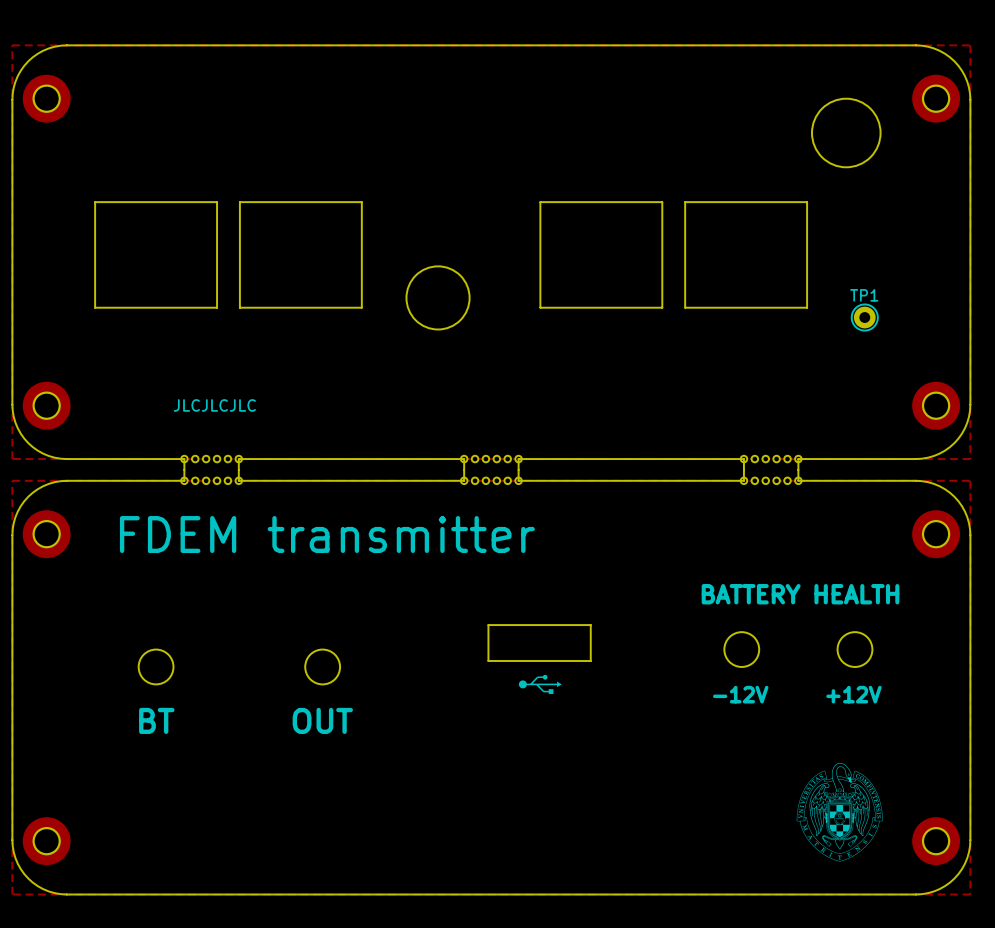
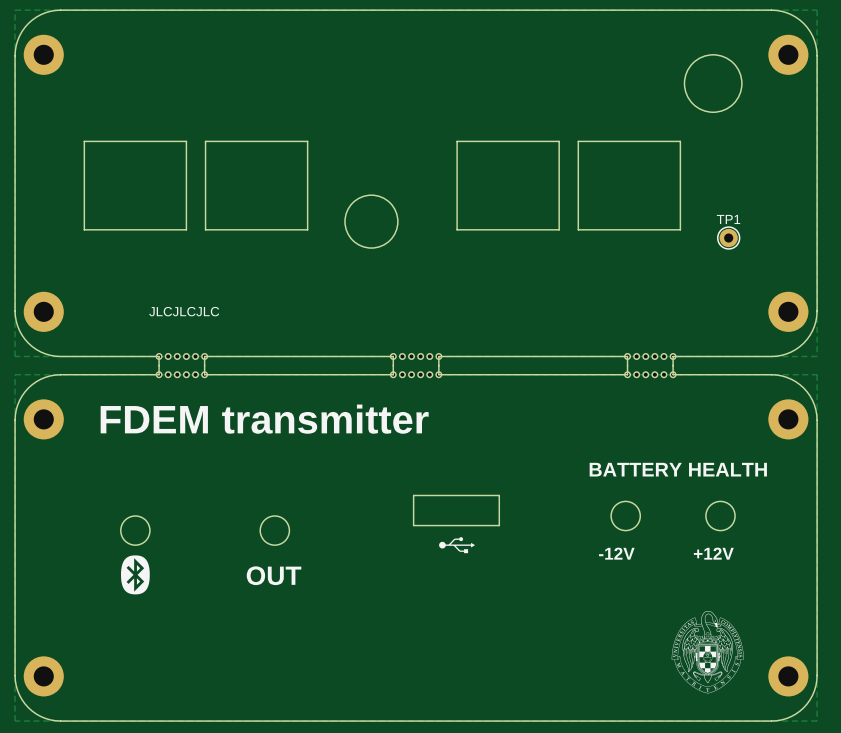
drawing: none -> [121, 555, 150, 595]
text: BT (156, 720) -> none

